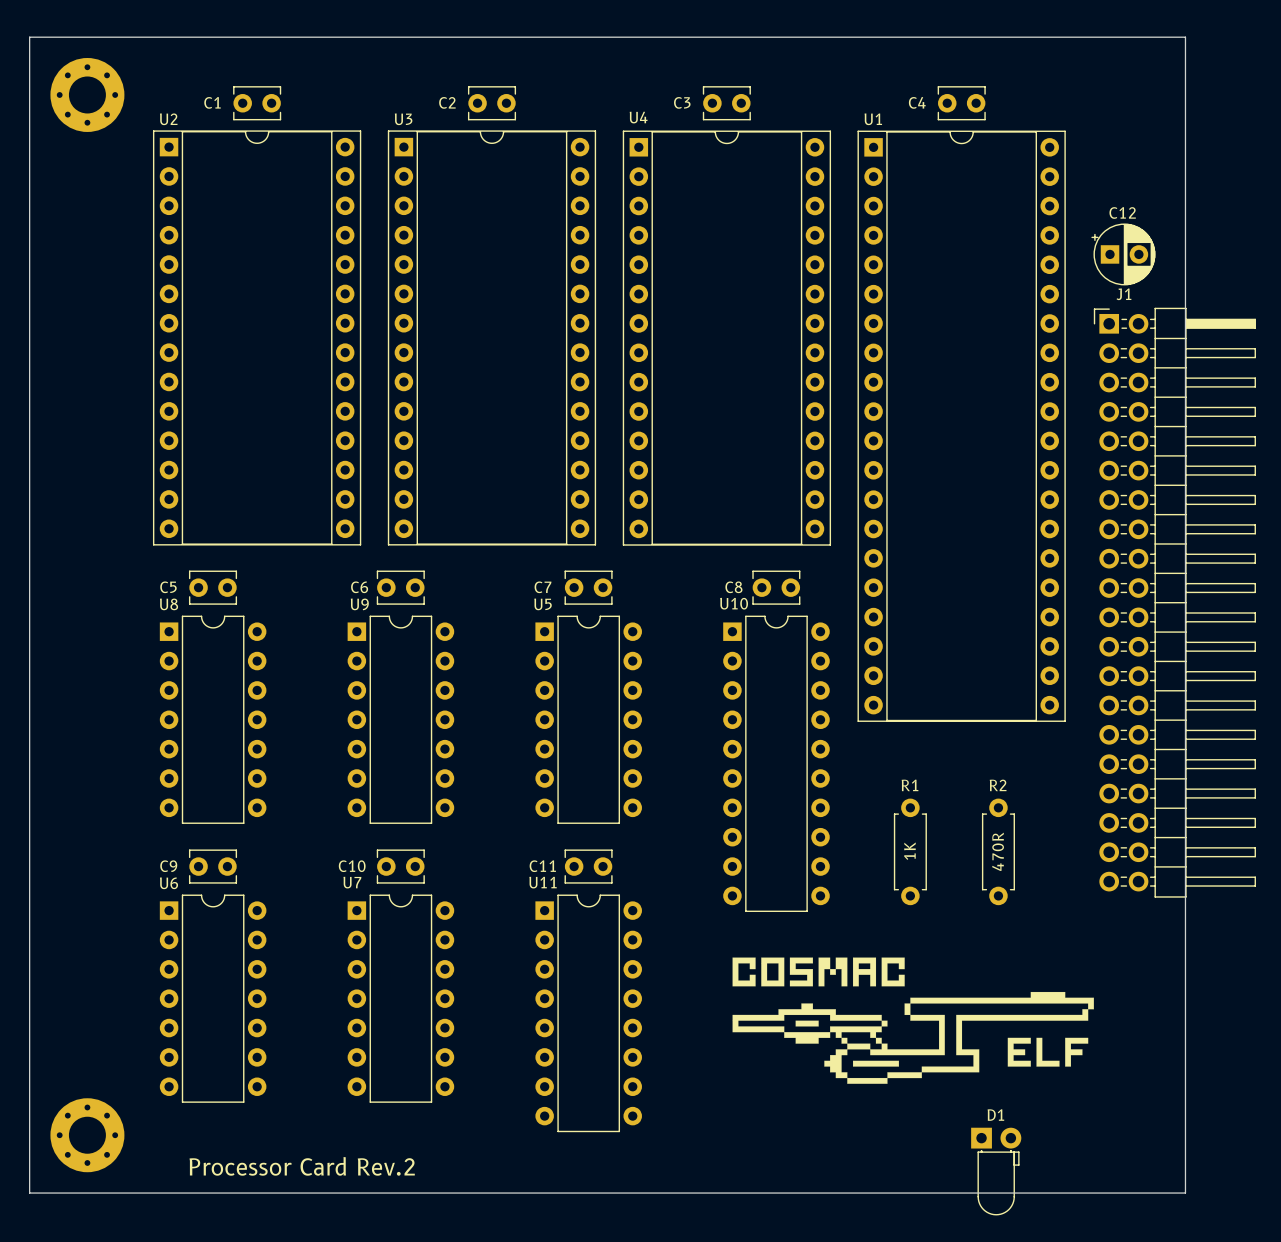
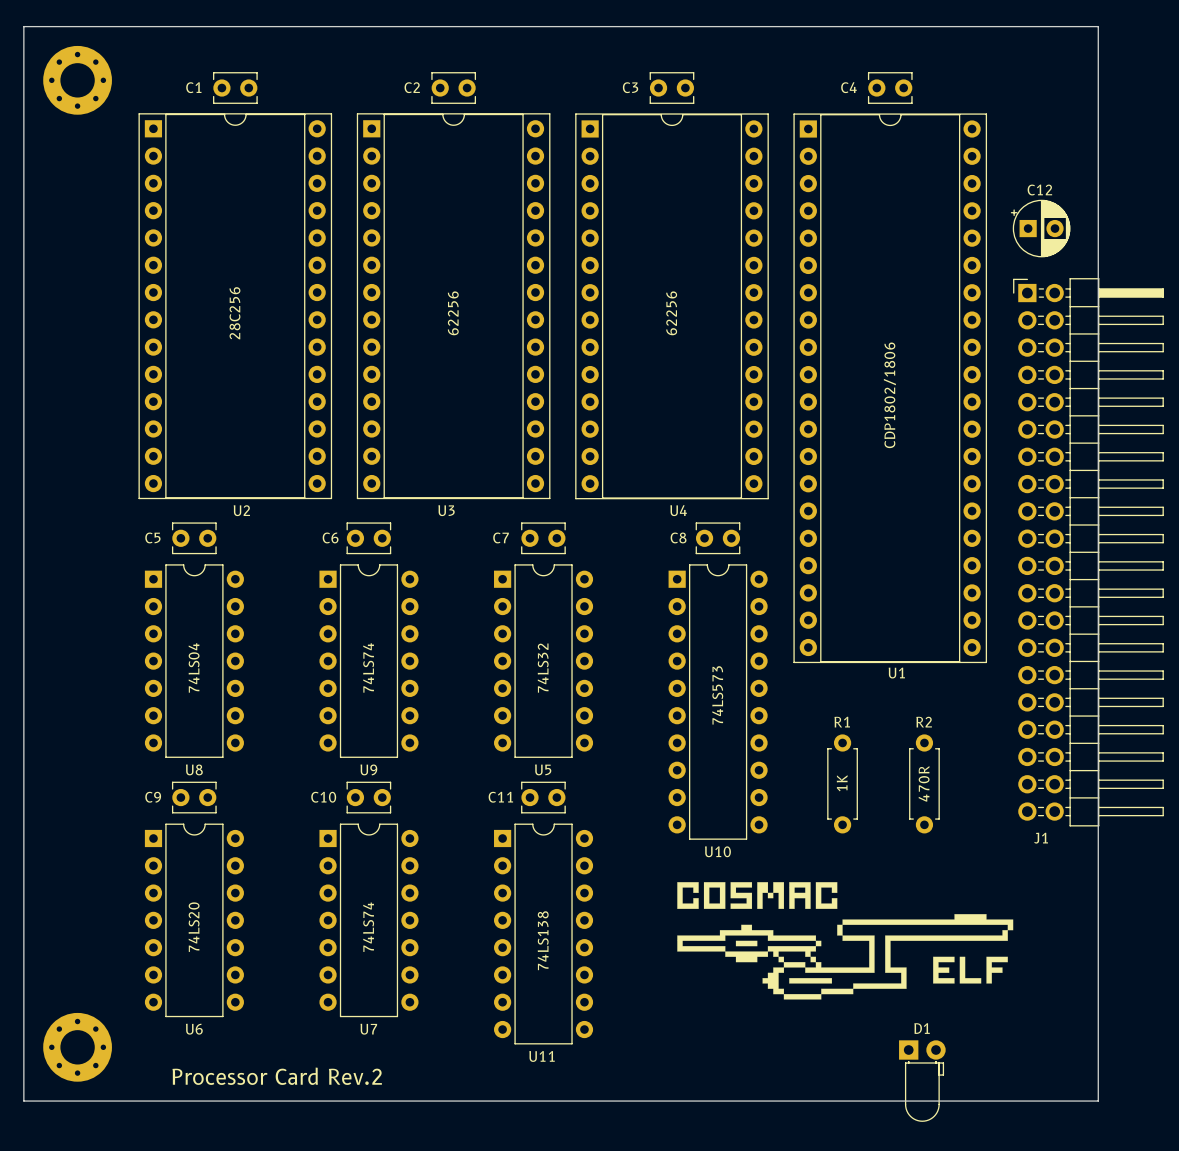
U4 name position: U4 (638, 117) -> U4 (678, 510)
U2 name position: U2 (168, 119) -> U2 (241, 510)
U3 name position: U3 (403, 119) -> U3 (446, 510)
U1 name position: U1 (873, 119) -> U1 (896, 673)
J1 name position: J1 (1123, 294) -> J1 (1041, 838)
U2 value: none -> 28C256 (234, 313)
U3 value: none -> 62256 (453, 313)
U4 value: none -> 62256 (671, 313)
U1 value: none -> CDP1802/1806 (889, 395)
U10 name position: U10 (734, 603) -> U10 (717, 851)
U8 name position: U8 (169, 604) -> U8 (194, 769)
U9 name position: U9 (359, 604) -> U9 (368, 769)
U5 name position: U5 (543, 604) -> U5 (543, 769)
U8 value: none -> 74LS04 (194, 667)
U9 value: none -> 74LS74 (368, 667)
U5 value: none -> 74LS32 (543, 668)
U10 value: none -> 74LS573 (717, 695)
U7 name position: U7 (352, 882) -> U7 (368, 1029)
U11 name position: U11 (543, 882) -> U11 (542, 1056)
U6 name position: U6 (169, 883) -> U6 (194, 1029)
U6 value: none -> 74LS20 (194, 927)
U7 value: none -> 74LS74 (368, 927)
U11 value: none -> 74LS138 (543, 940)

